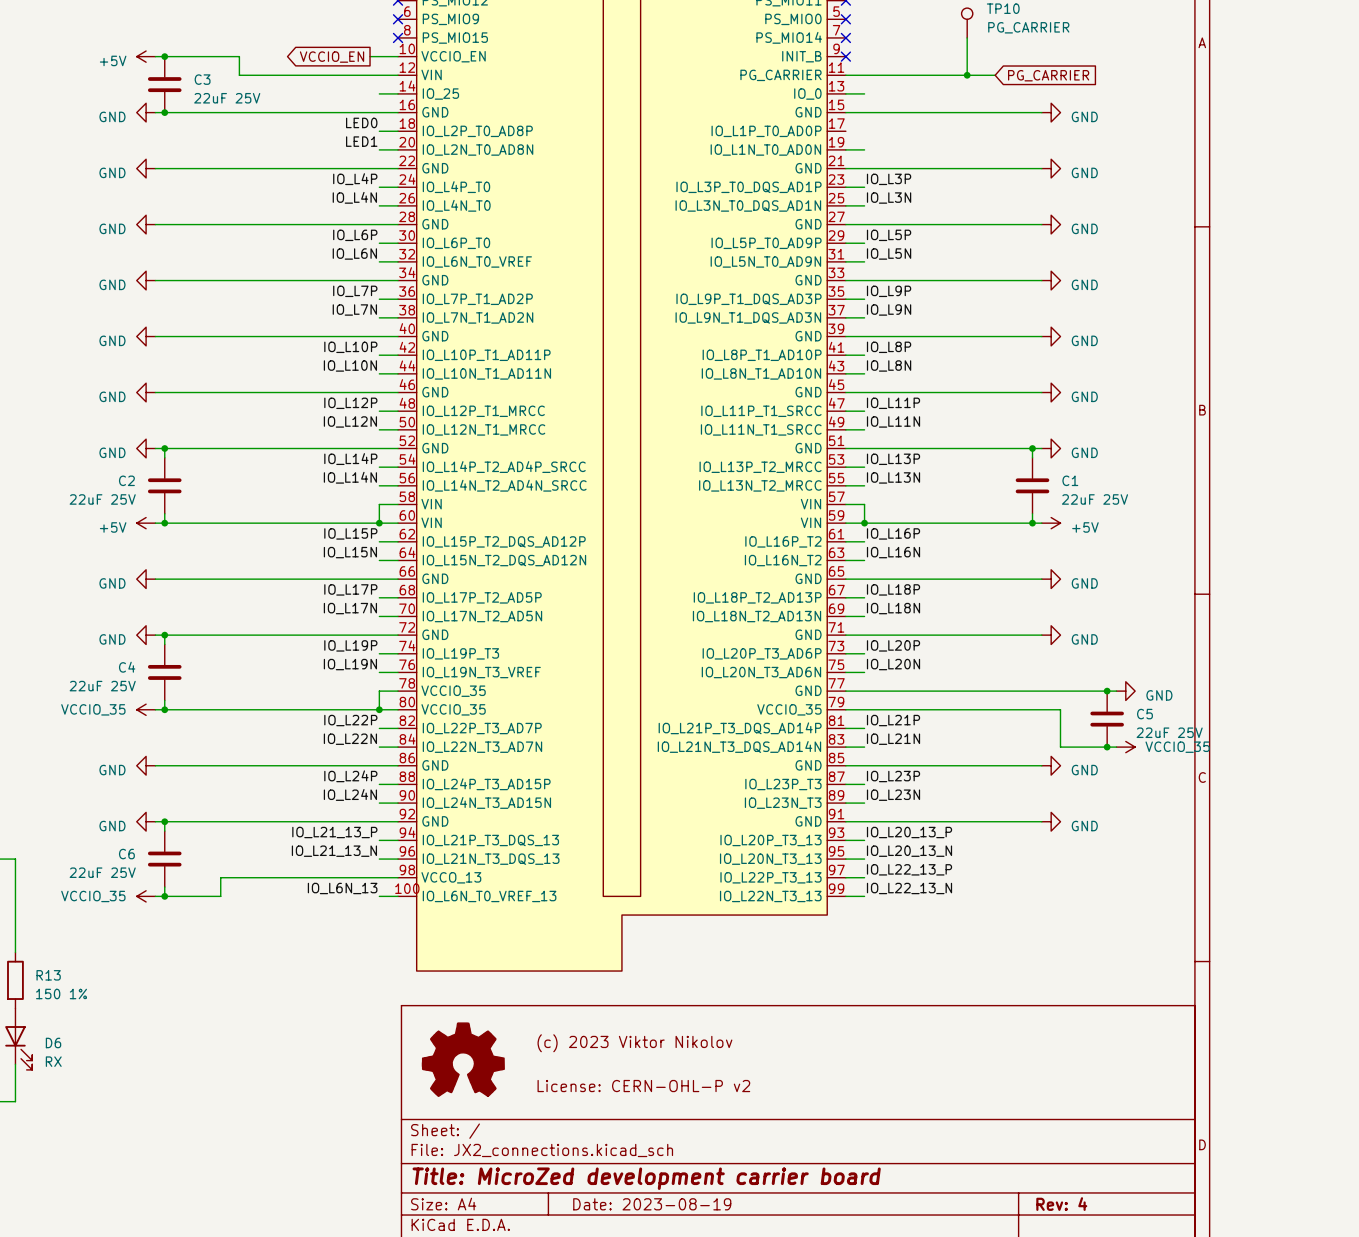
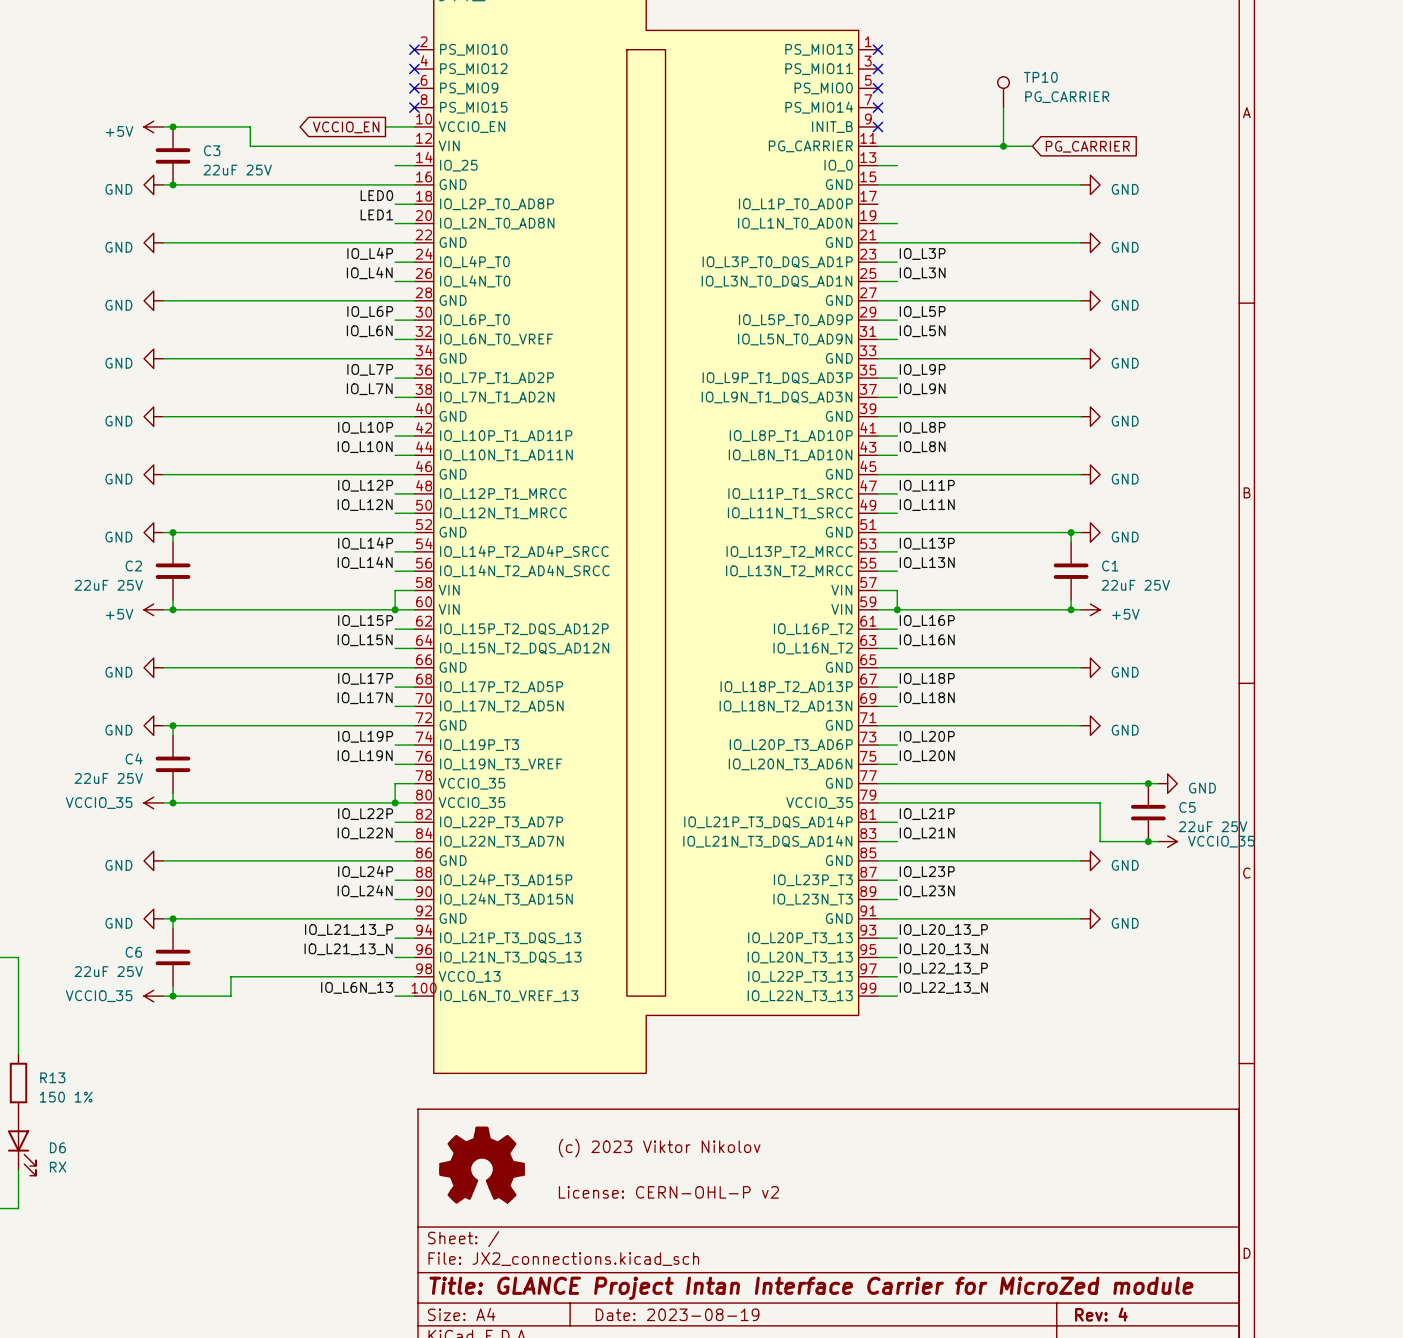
title block: Title: MicroZed development carrier board (646, 1178) -> Title: GLANCE Project Intan Interface Carrier for MicroZed module (811, 1288)

